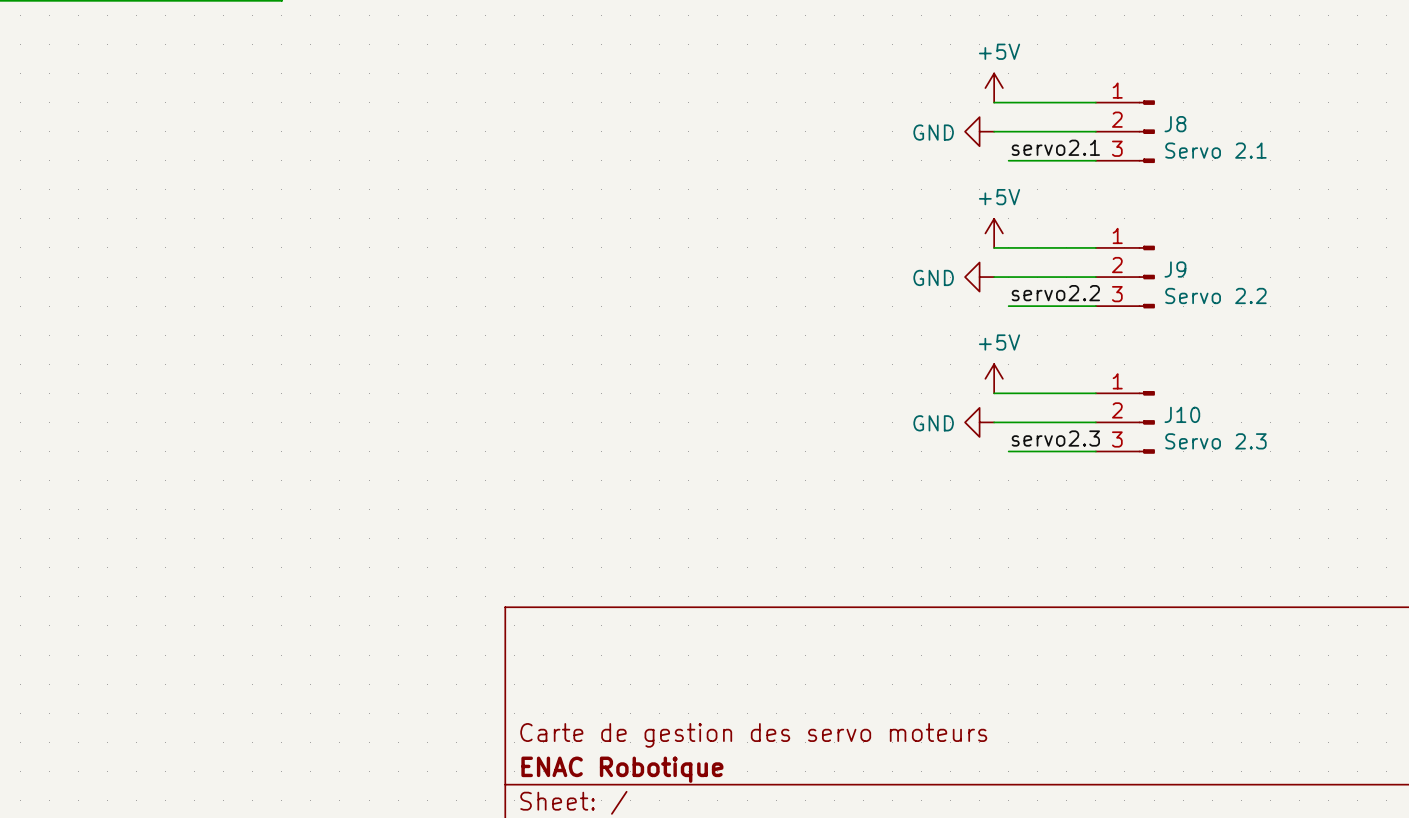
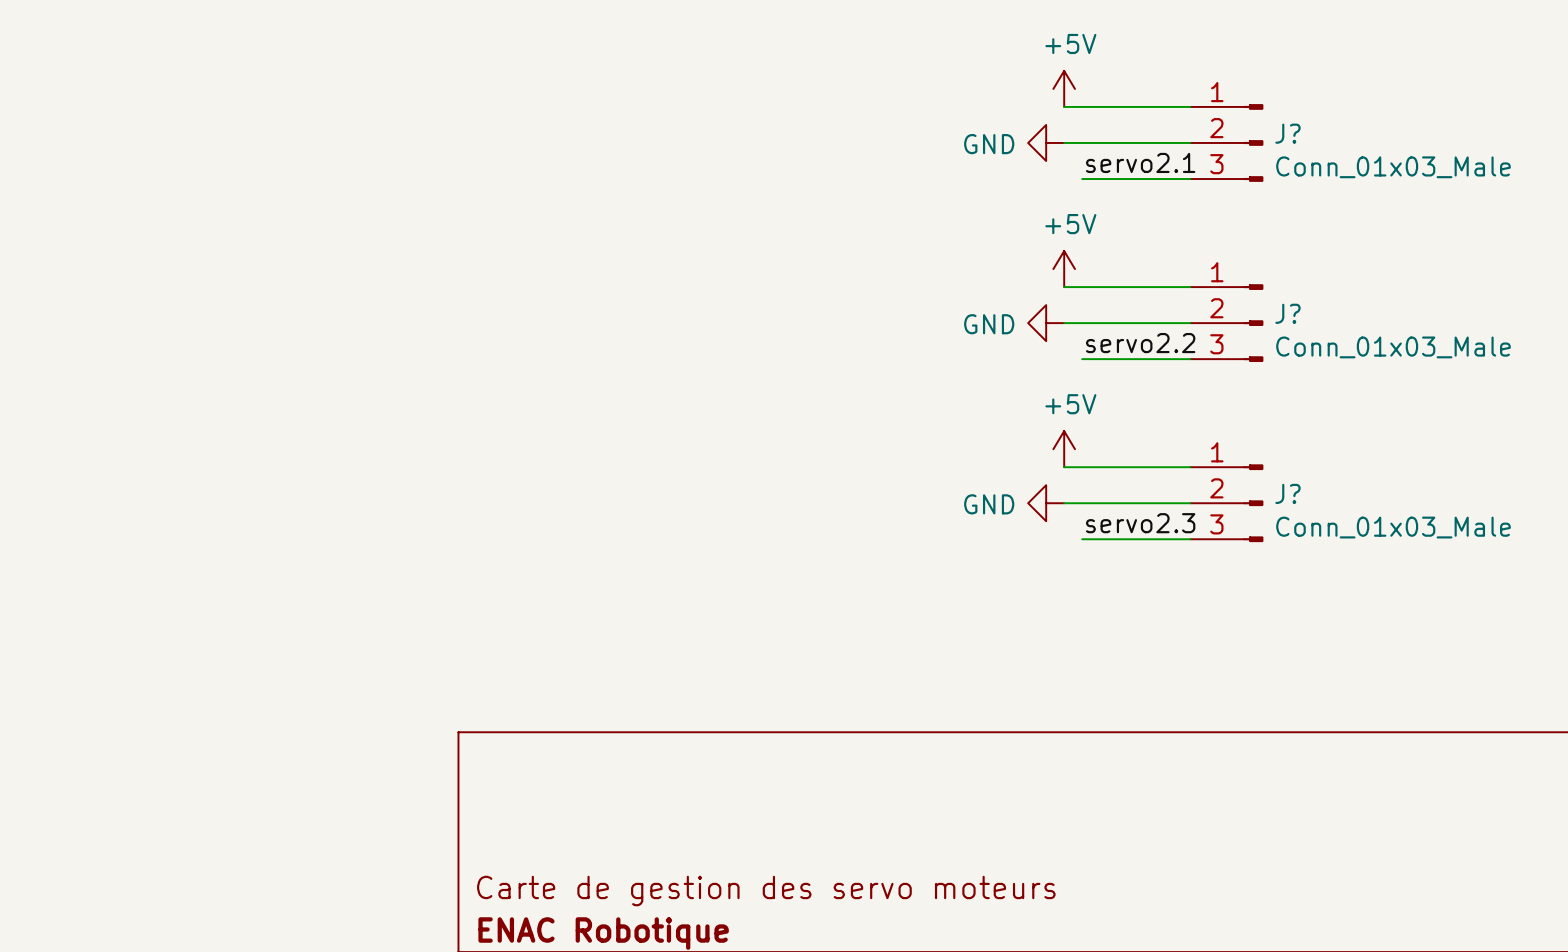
J8 name: J8 (1175, 124) -> J? (1287, 133)
J8 value: Servo 2.1 (1215, 150) -> Conn_01x03_Male (1393, 167)
J9 name: J9 (1175, 269) -> J? (1287, 313)
J9 value: Servo 2.2 (1215, 295) -> Conn_01x03_Male (1393, 347)
J10 name: J10 (1182, 414) -> J? (1287, 493)
J10 value: Servo 2.3 (1215, 441) -> Conn_01x03_Male (1393, 527)

